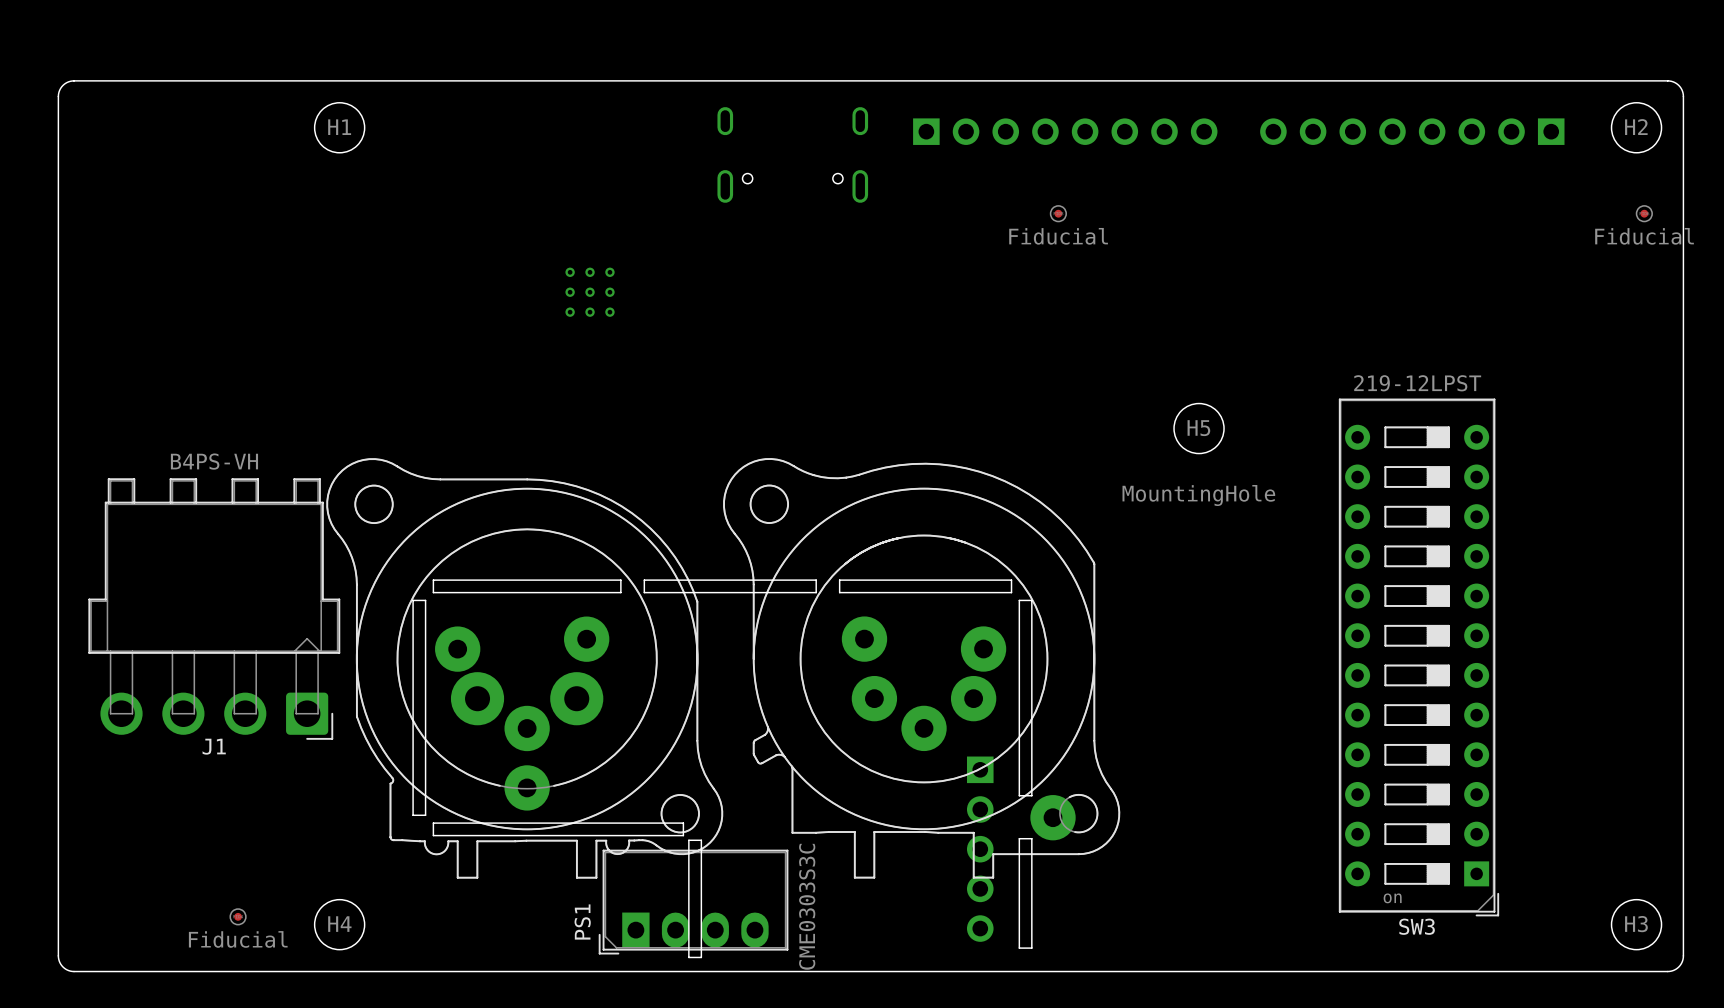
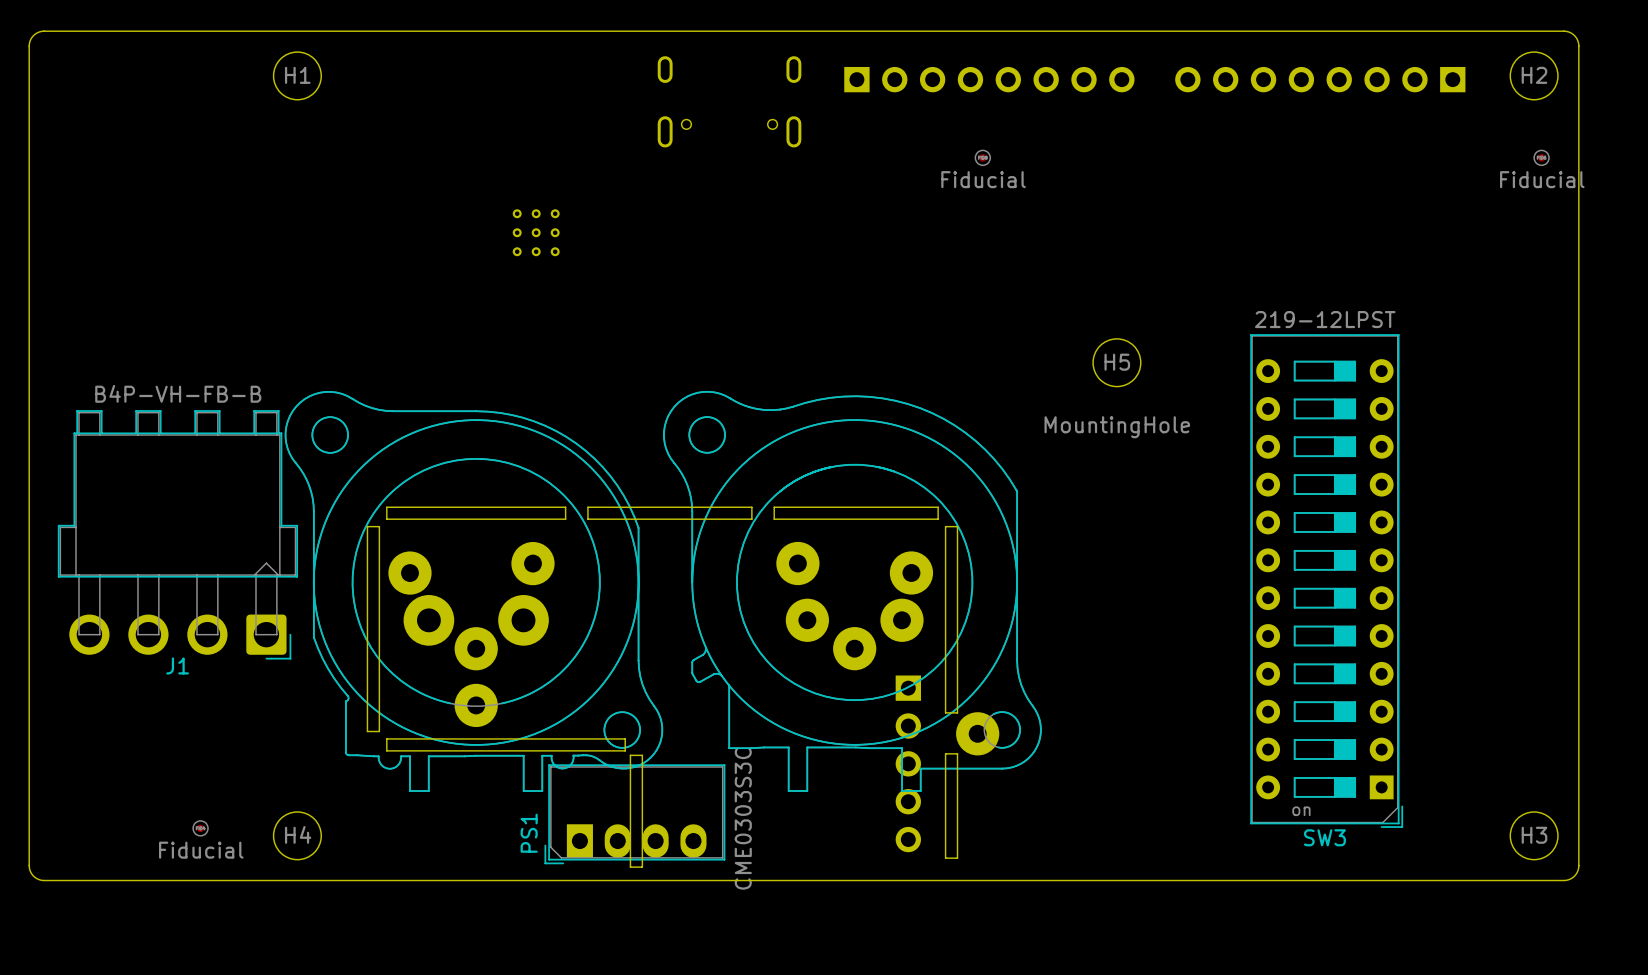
J1 value: B4PS-VH (214, 461) -> B4P-VH-FB-B (178, 393)

